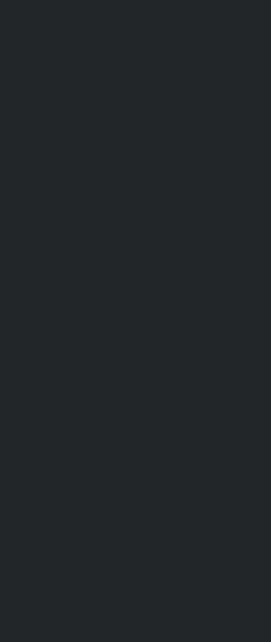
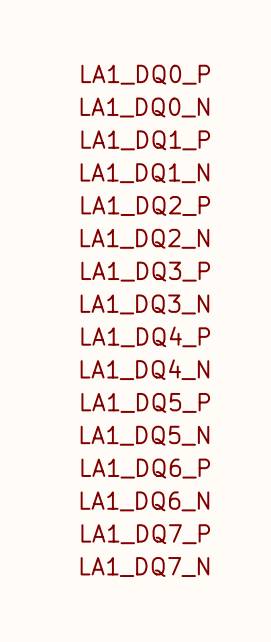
label: none -> LA1_DQ0_P (145, 74)
label: none -> LA1_DQ0_N (144, 107)
label: none -> LA1_DQ1_P (145, 140)
label: none -> LA1_DQ1_N (144, 173)
label: none -> LA1_DQ2_P (145, 205)
label: none -> LA1_DQ2_N (144, 238)
label: none -> LA1_DQ3_P (145, 271)
label: none -> LA1_DQ3_N (144, 304)
label: none -> LA1_DQ4_P (145, 336)
label: none -> LA1_DQ4_N (144, 369)
label: none -> LA1_DQ5_P (145, 402)
label: none -> LA1_DQ5_N (144, 435)
label: none -> LA1_DQ6_P (145, 468)
label: none -> LA1_DQ6_N (144, 501)
label: none -> LA1_DQ7_P (145, 534)
label: none -> LA1_DQ7_N (144, 567)

